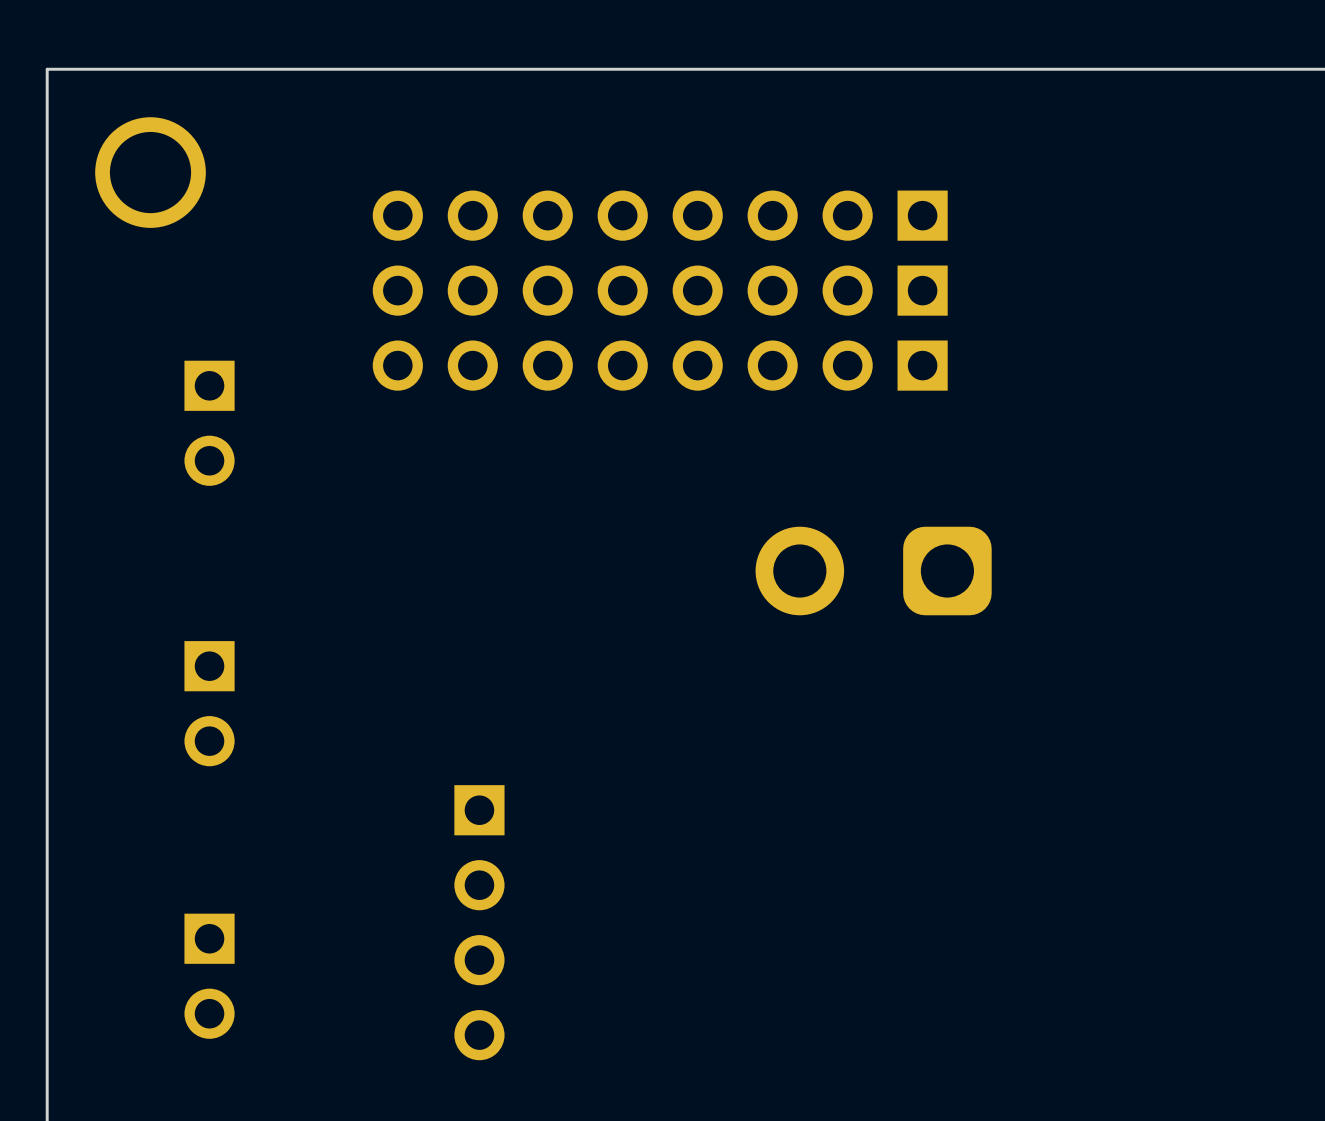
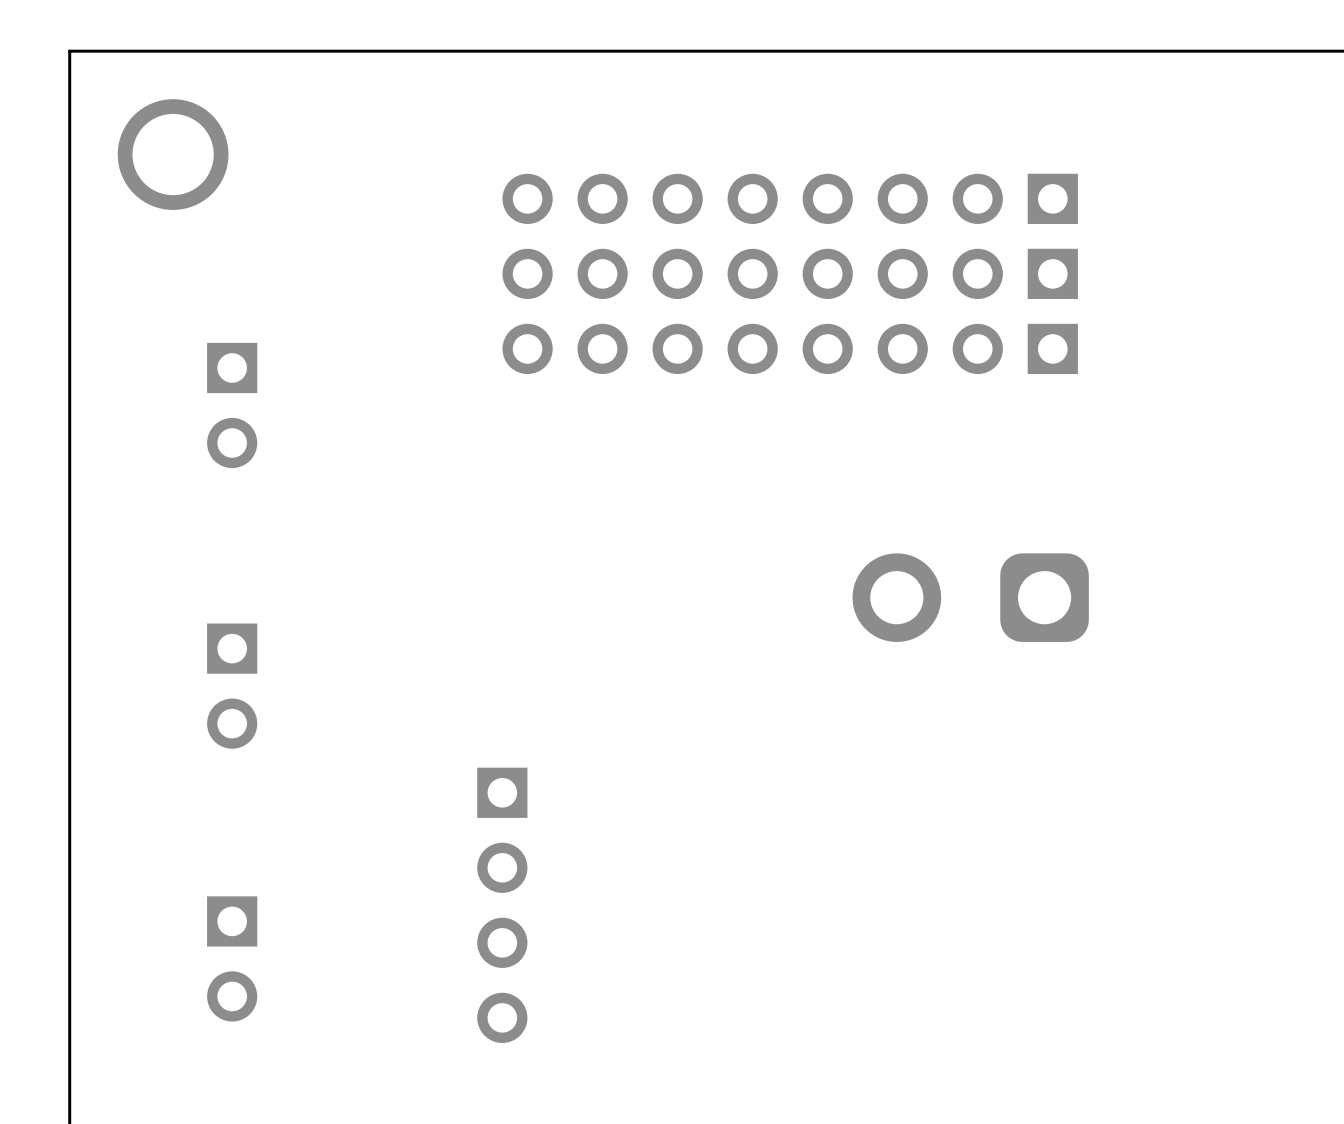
part: (660, 215) -> none
part: none -> (790, 198)
part: (660, 290) -> none
part: none -> (790, 273)
part: (660, 365) -> none
part: none -> (790, 348)
part position: (873, 571) -> (970, 597)

